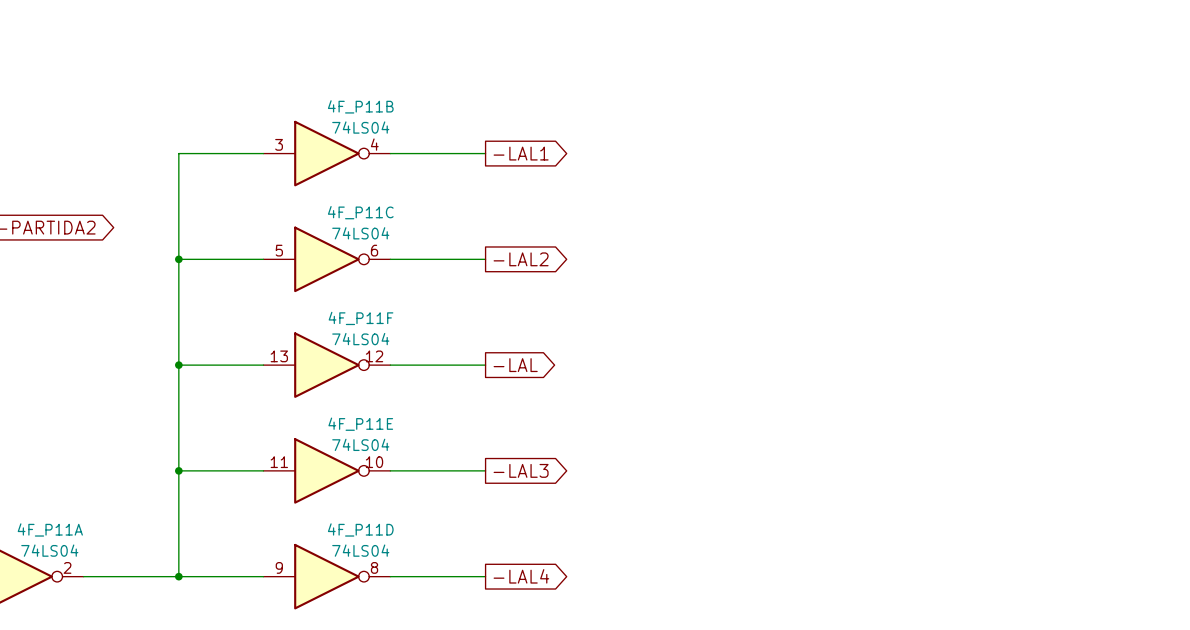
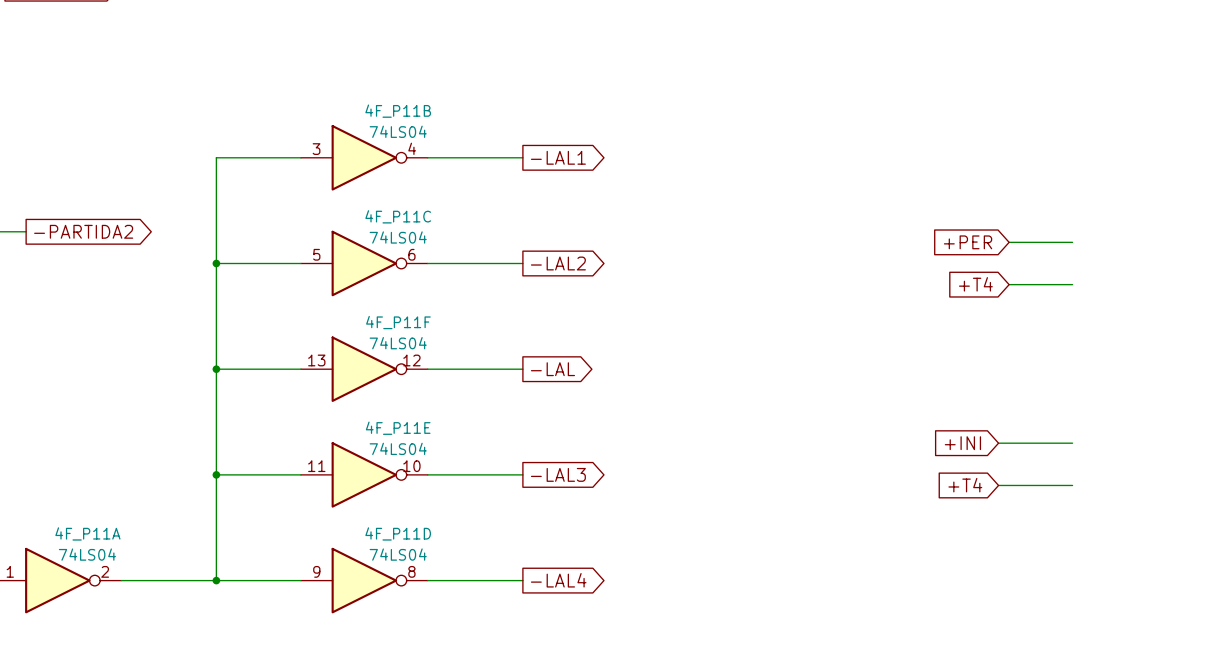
global label: none -> +PER (968, 242)
wire: none -> (1009, 242) (1072, 242)
global label: none -> +T4 (975, 284)
wire: none -> (1009, 284) (1072, 284)
global label: none -> +INI (962, 443)
wire: none -> (998, 443) (1072, 443)
global label: none -> +T4 (965, 485)
wire: none -> (998, 485) (1072, 485)

